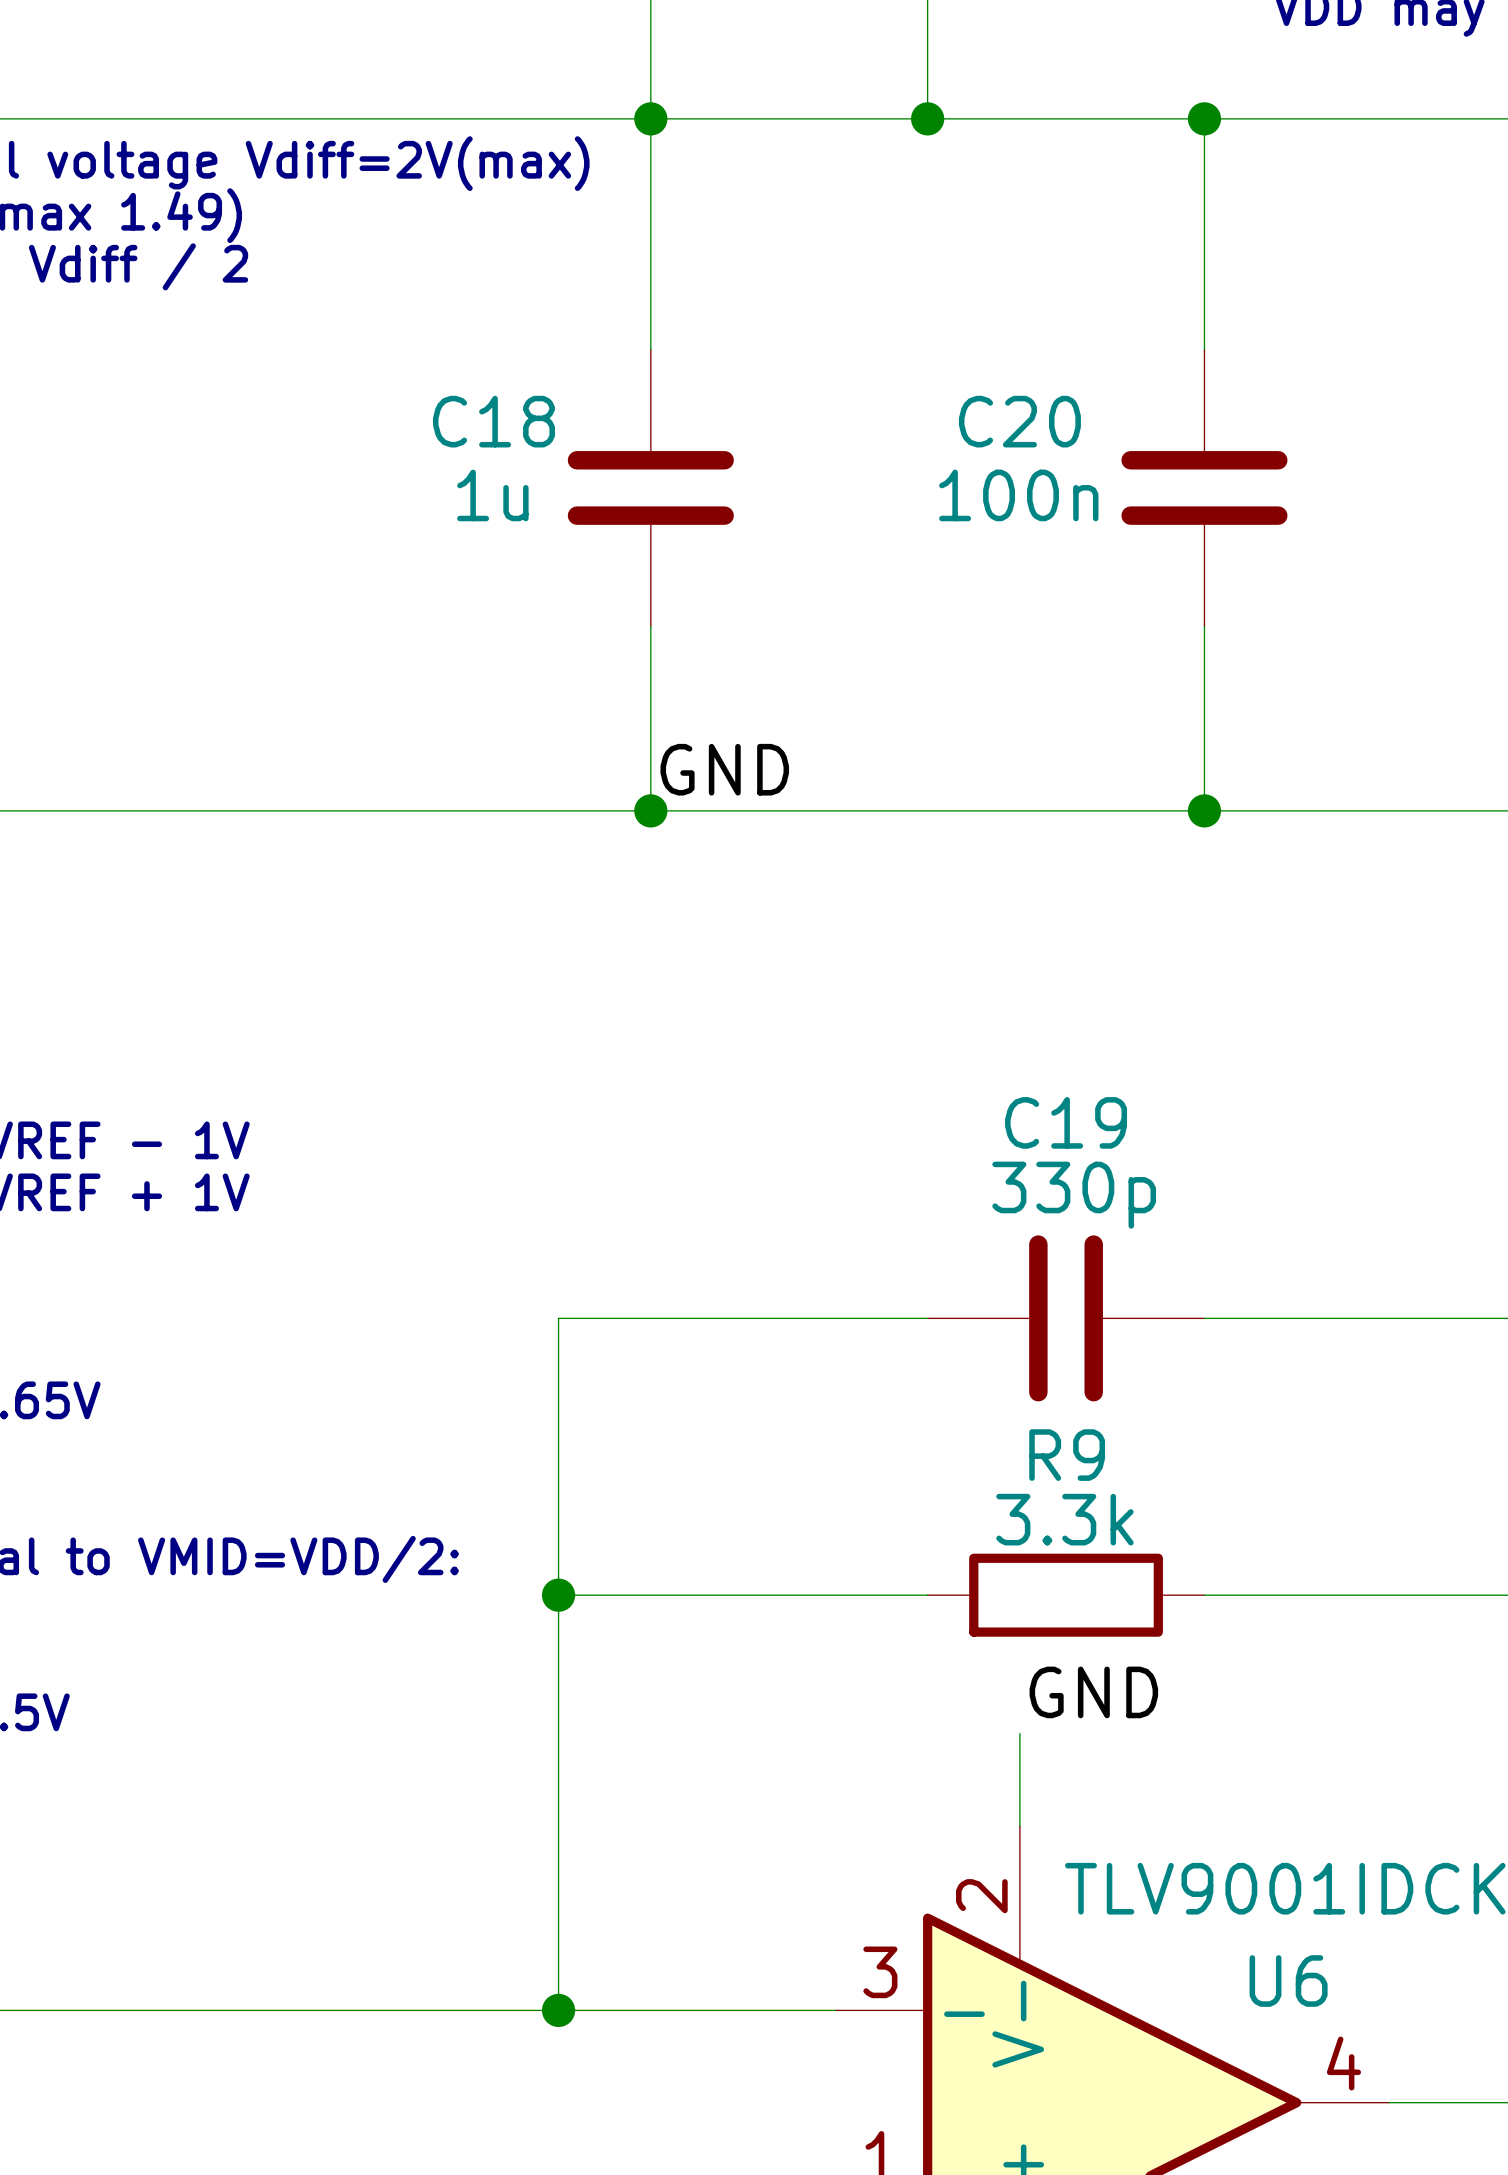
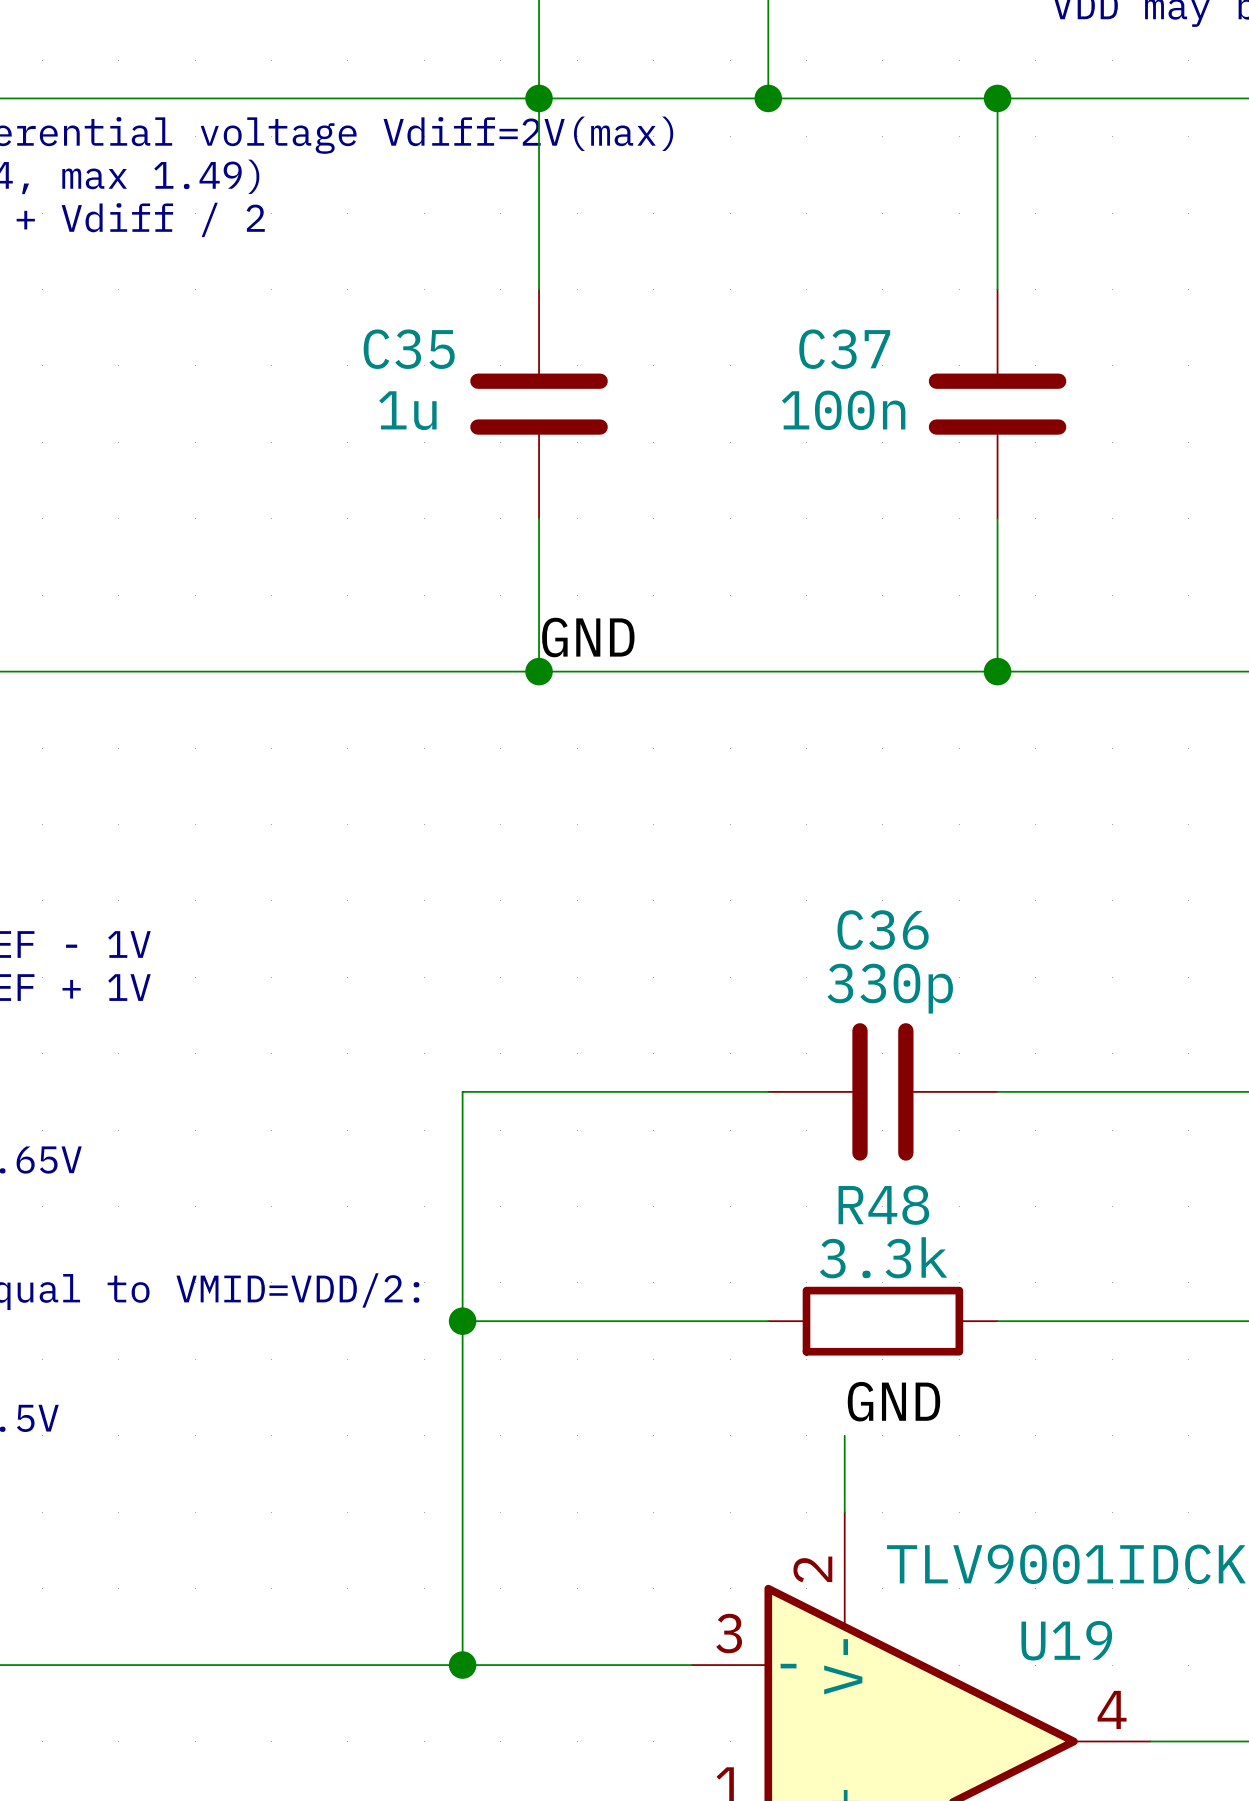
C18 name: C18 (493, 421) -> C35 (409, 349)
C20 name: C20 (1019, 421) -> C37 (844, 349)
C19 name: C19 (1066, 1122) -> C36 (883, 930)
R9 name: R9 (1067, 1455) -> R48 (883, 1205)
U6 name: U6 (1288, 1981) -> U19 (1066, 1640)

